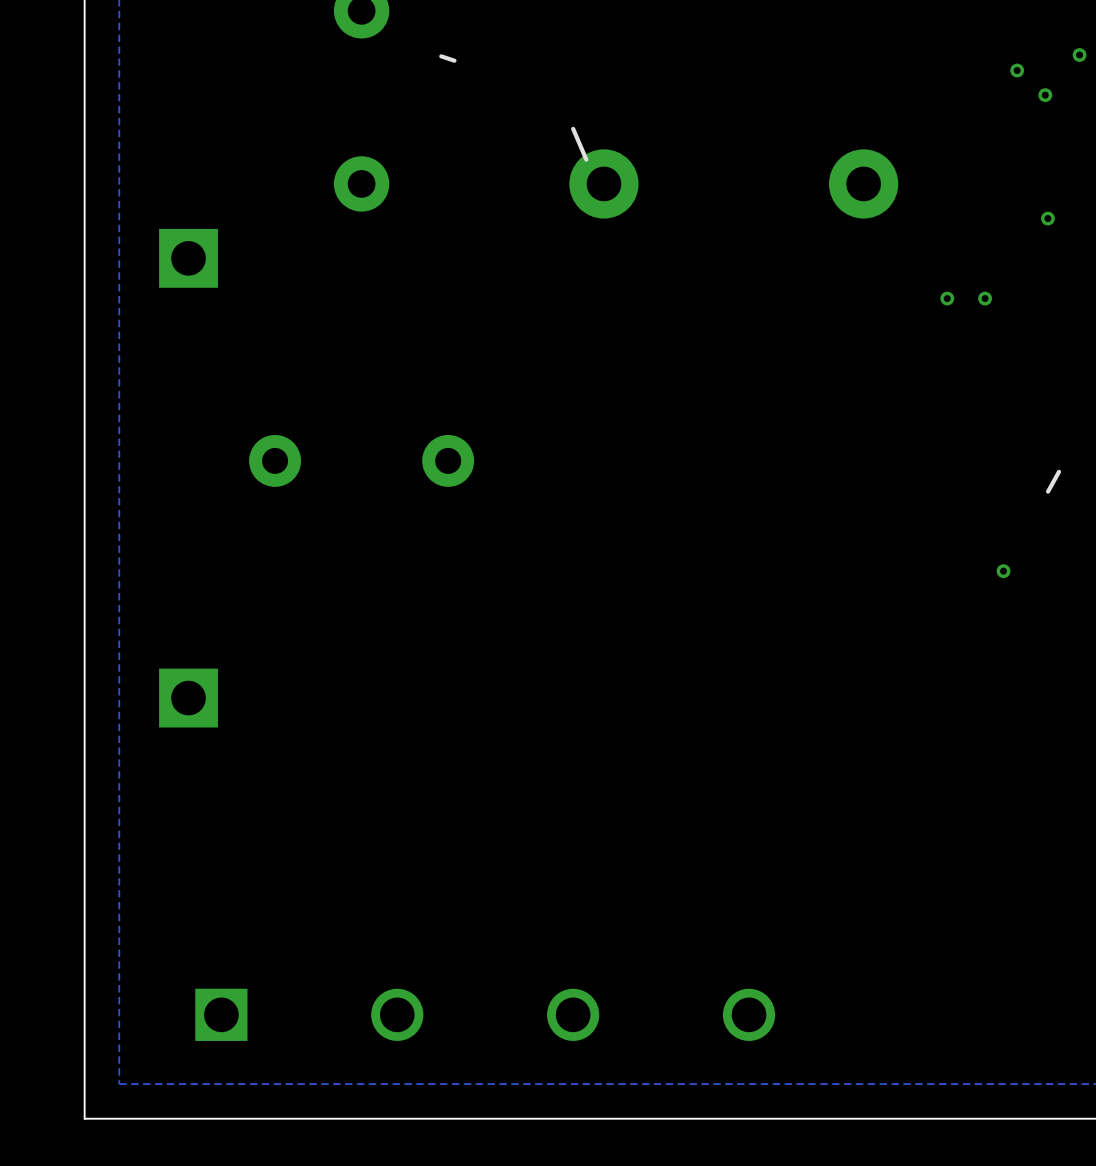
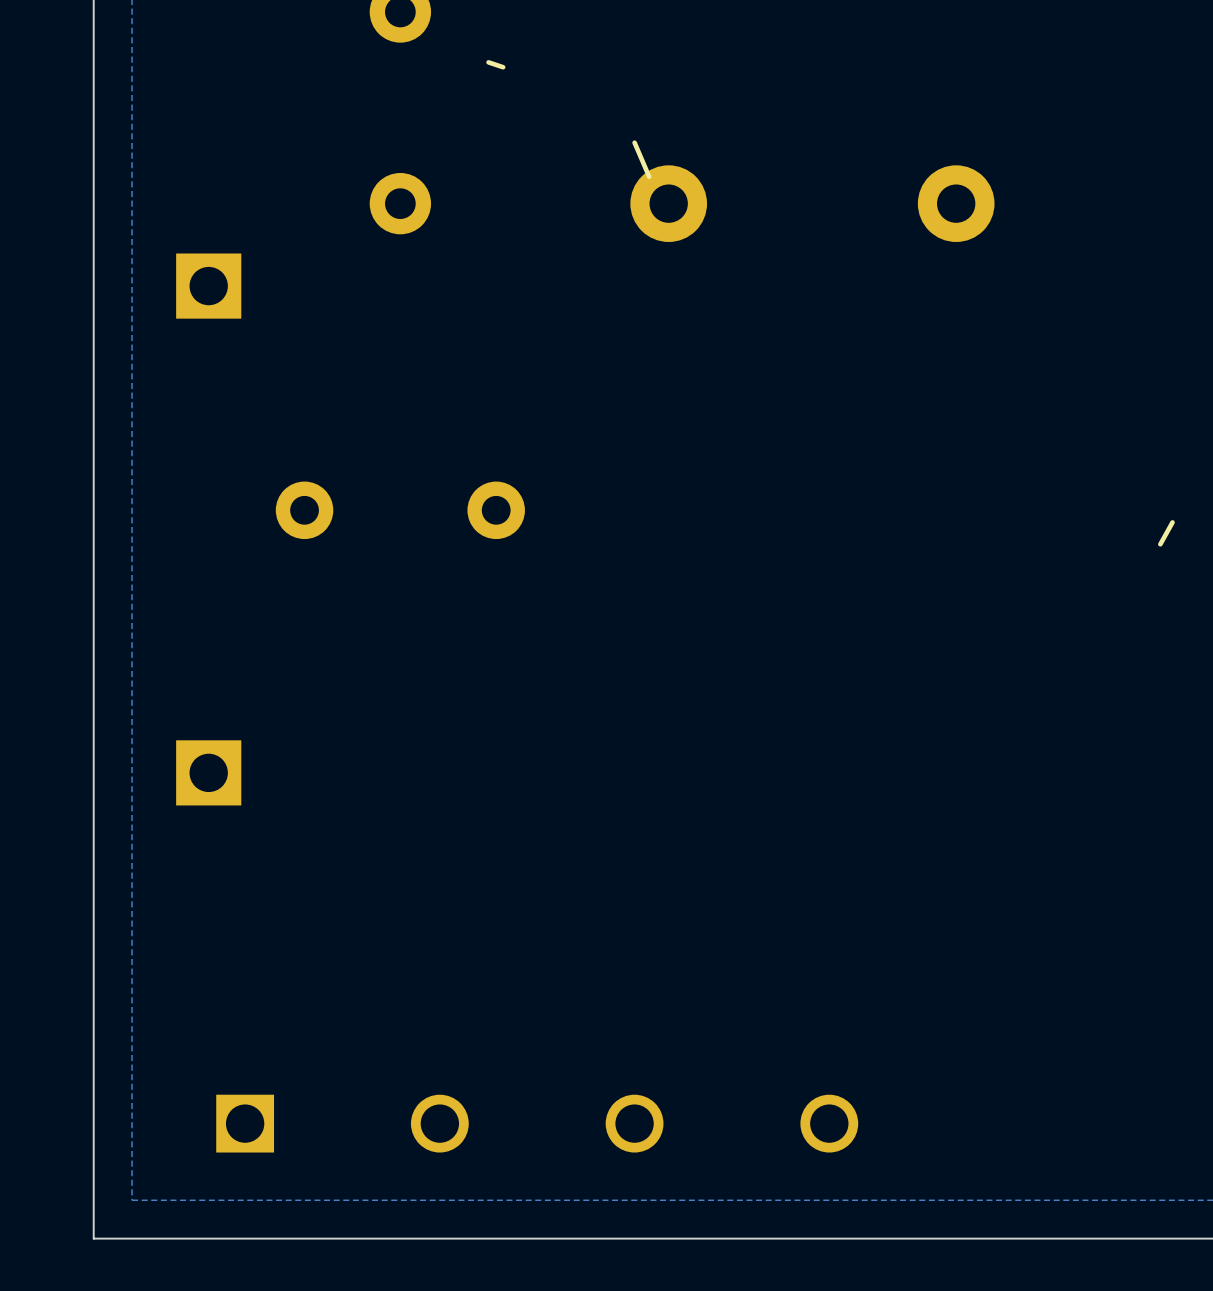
via: (1079, 55) -> none
via: (1017, 70) -> none
via: (1045, 95) -> none
via: (1047, 218) -> none
via: (947, 298) -> none
via: (985, 298) -> none
via: (1003, 571) -> none

